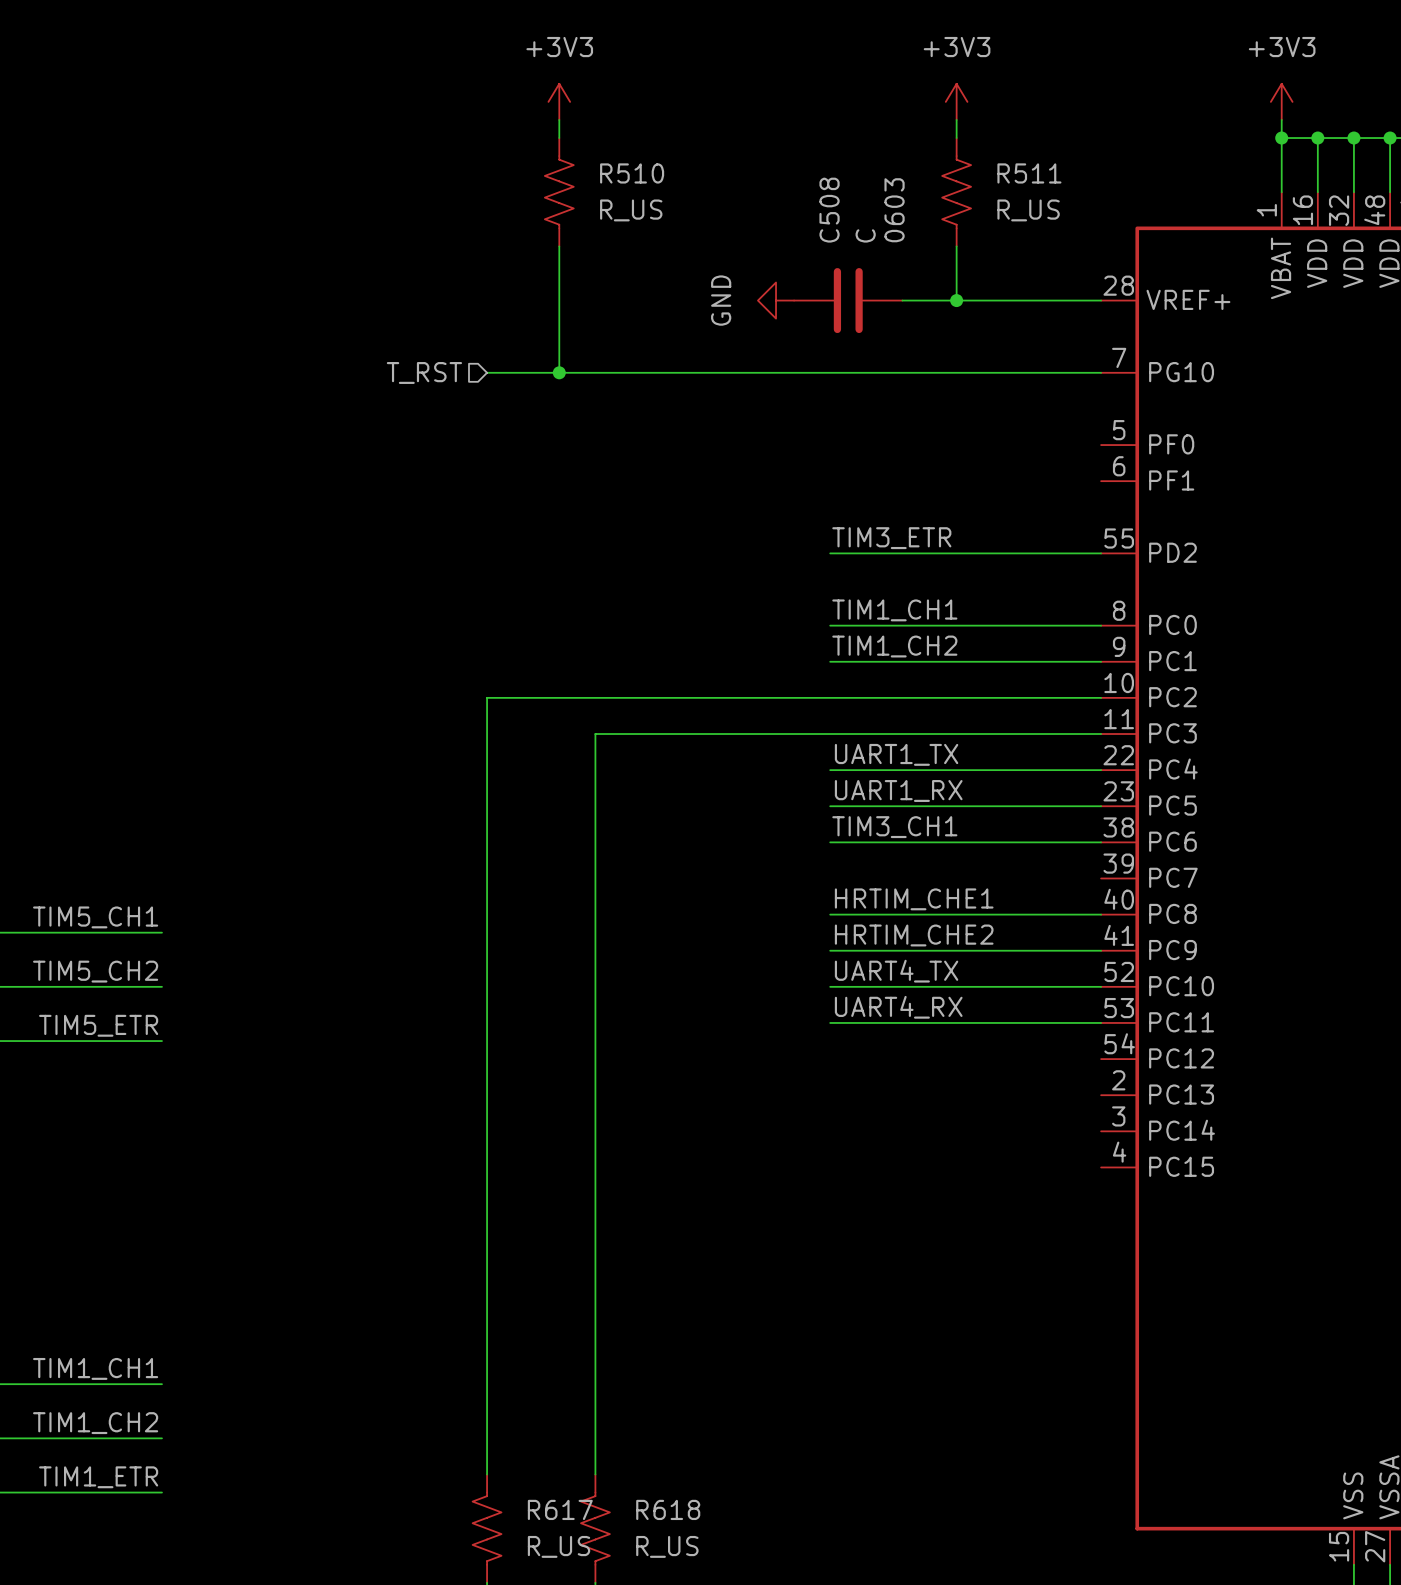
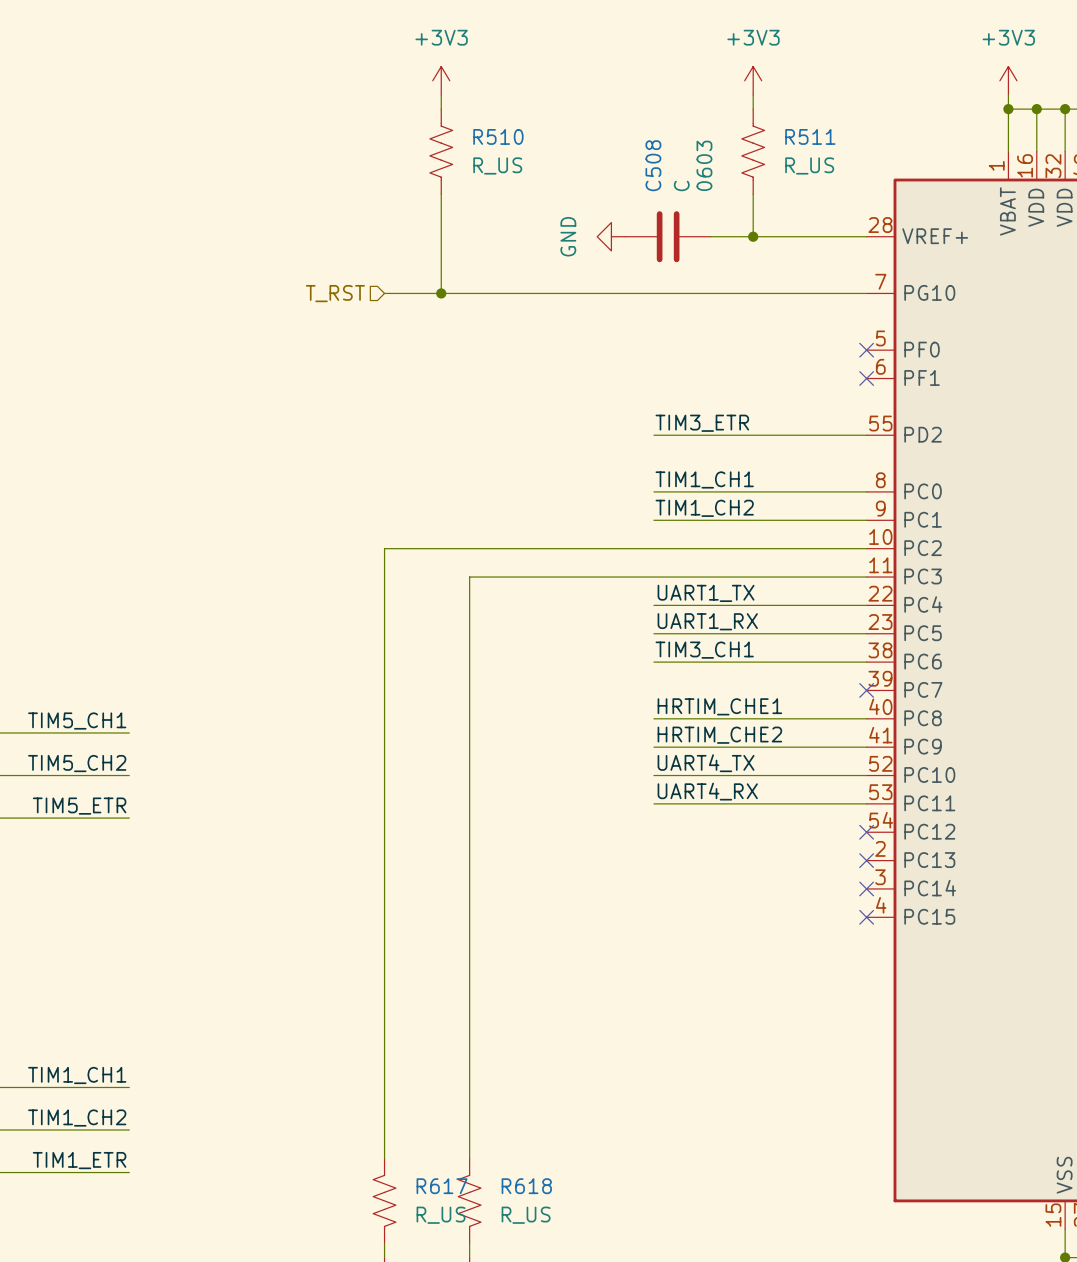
no-connect mark: none -> (866, 350)
no-connect mark: none -> (866, 378)
no-connect mark: none -> (866, 690)
no-connect mark: none -> (866, 832)
no-connect mark: none -> (866, 860)
no-connect mark: none -> (866, 888)
no-connect mark: none -> (866, 917)

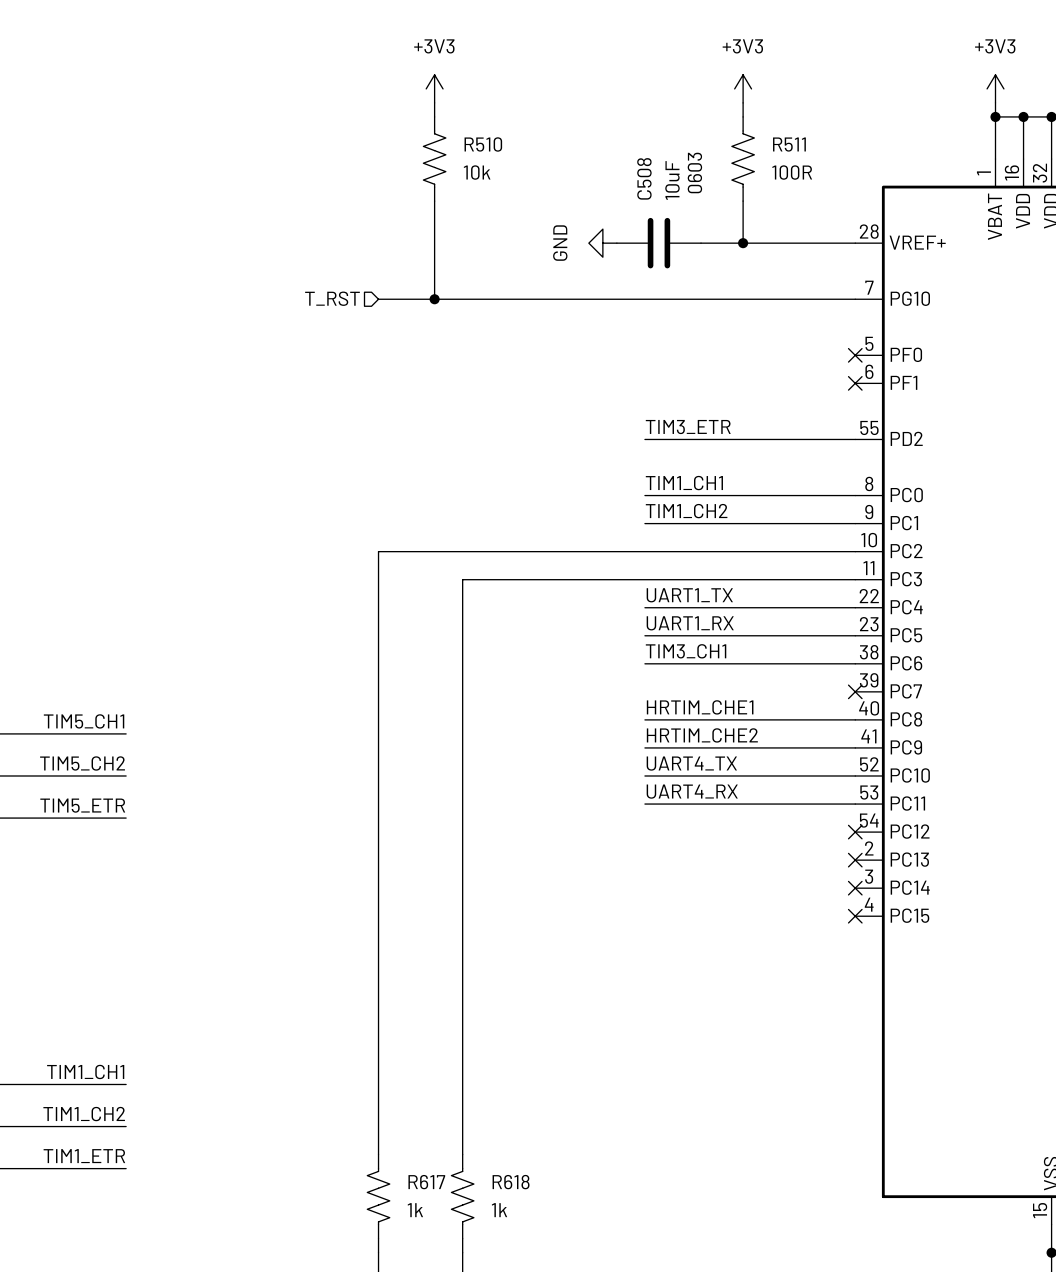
R510 value: R_US (497, 165) -> 10k (477, 172)
R511 value: R_US (809, 165) -> 100R (792, 172)
C508 value: C (681, 185) -> 10uF (672, 180)
R617 value: R_US (441, 1215) -> 1k (415, 1210)
R618 value: R_US (526, 1215) -> 1k (499, 1210)

